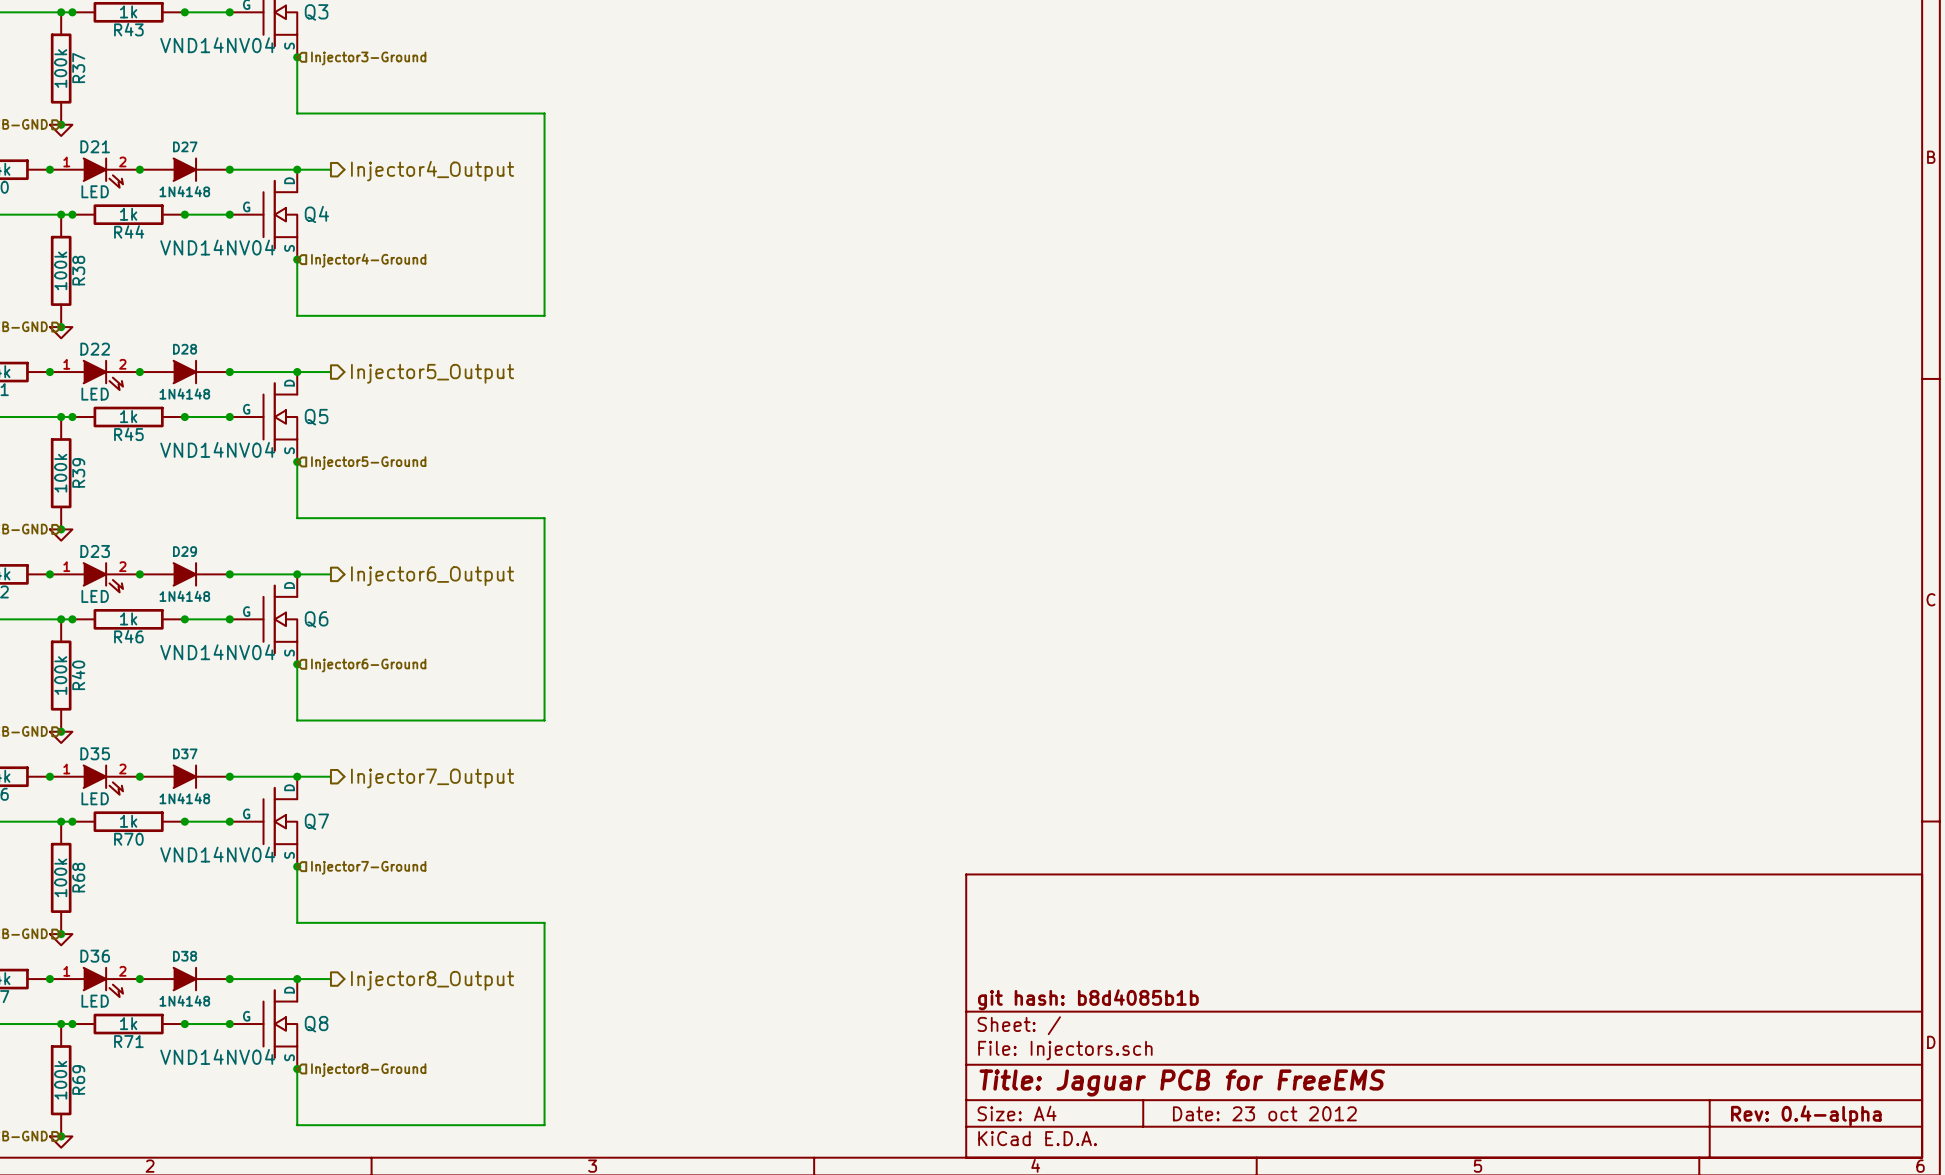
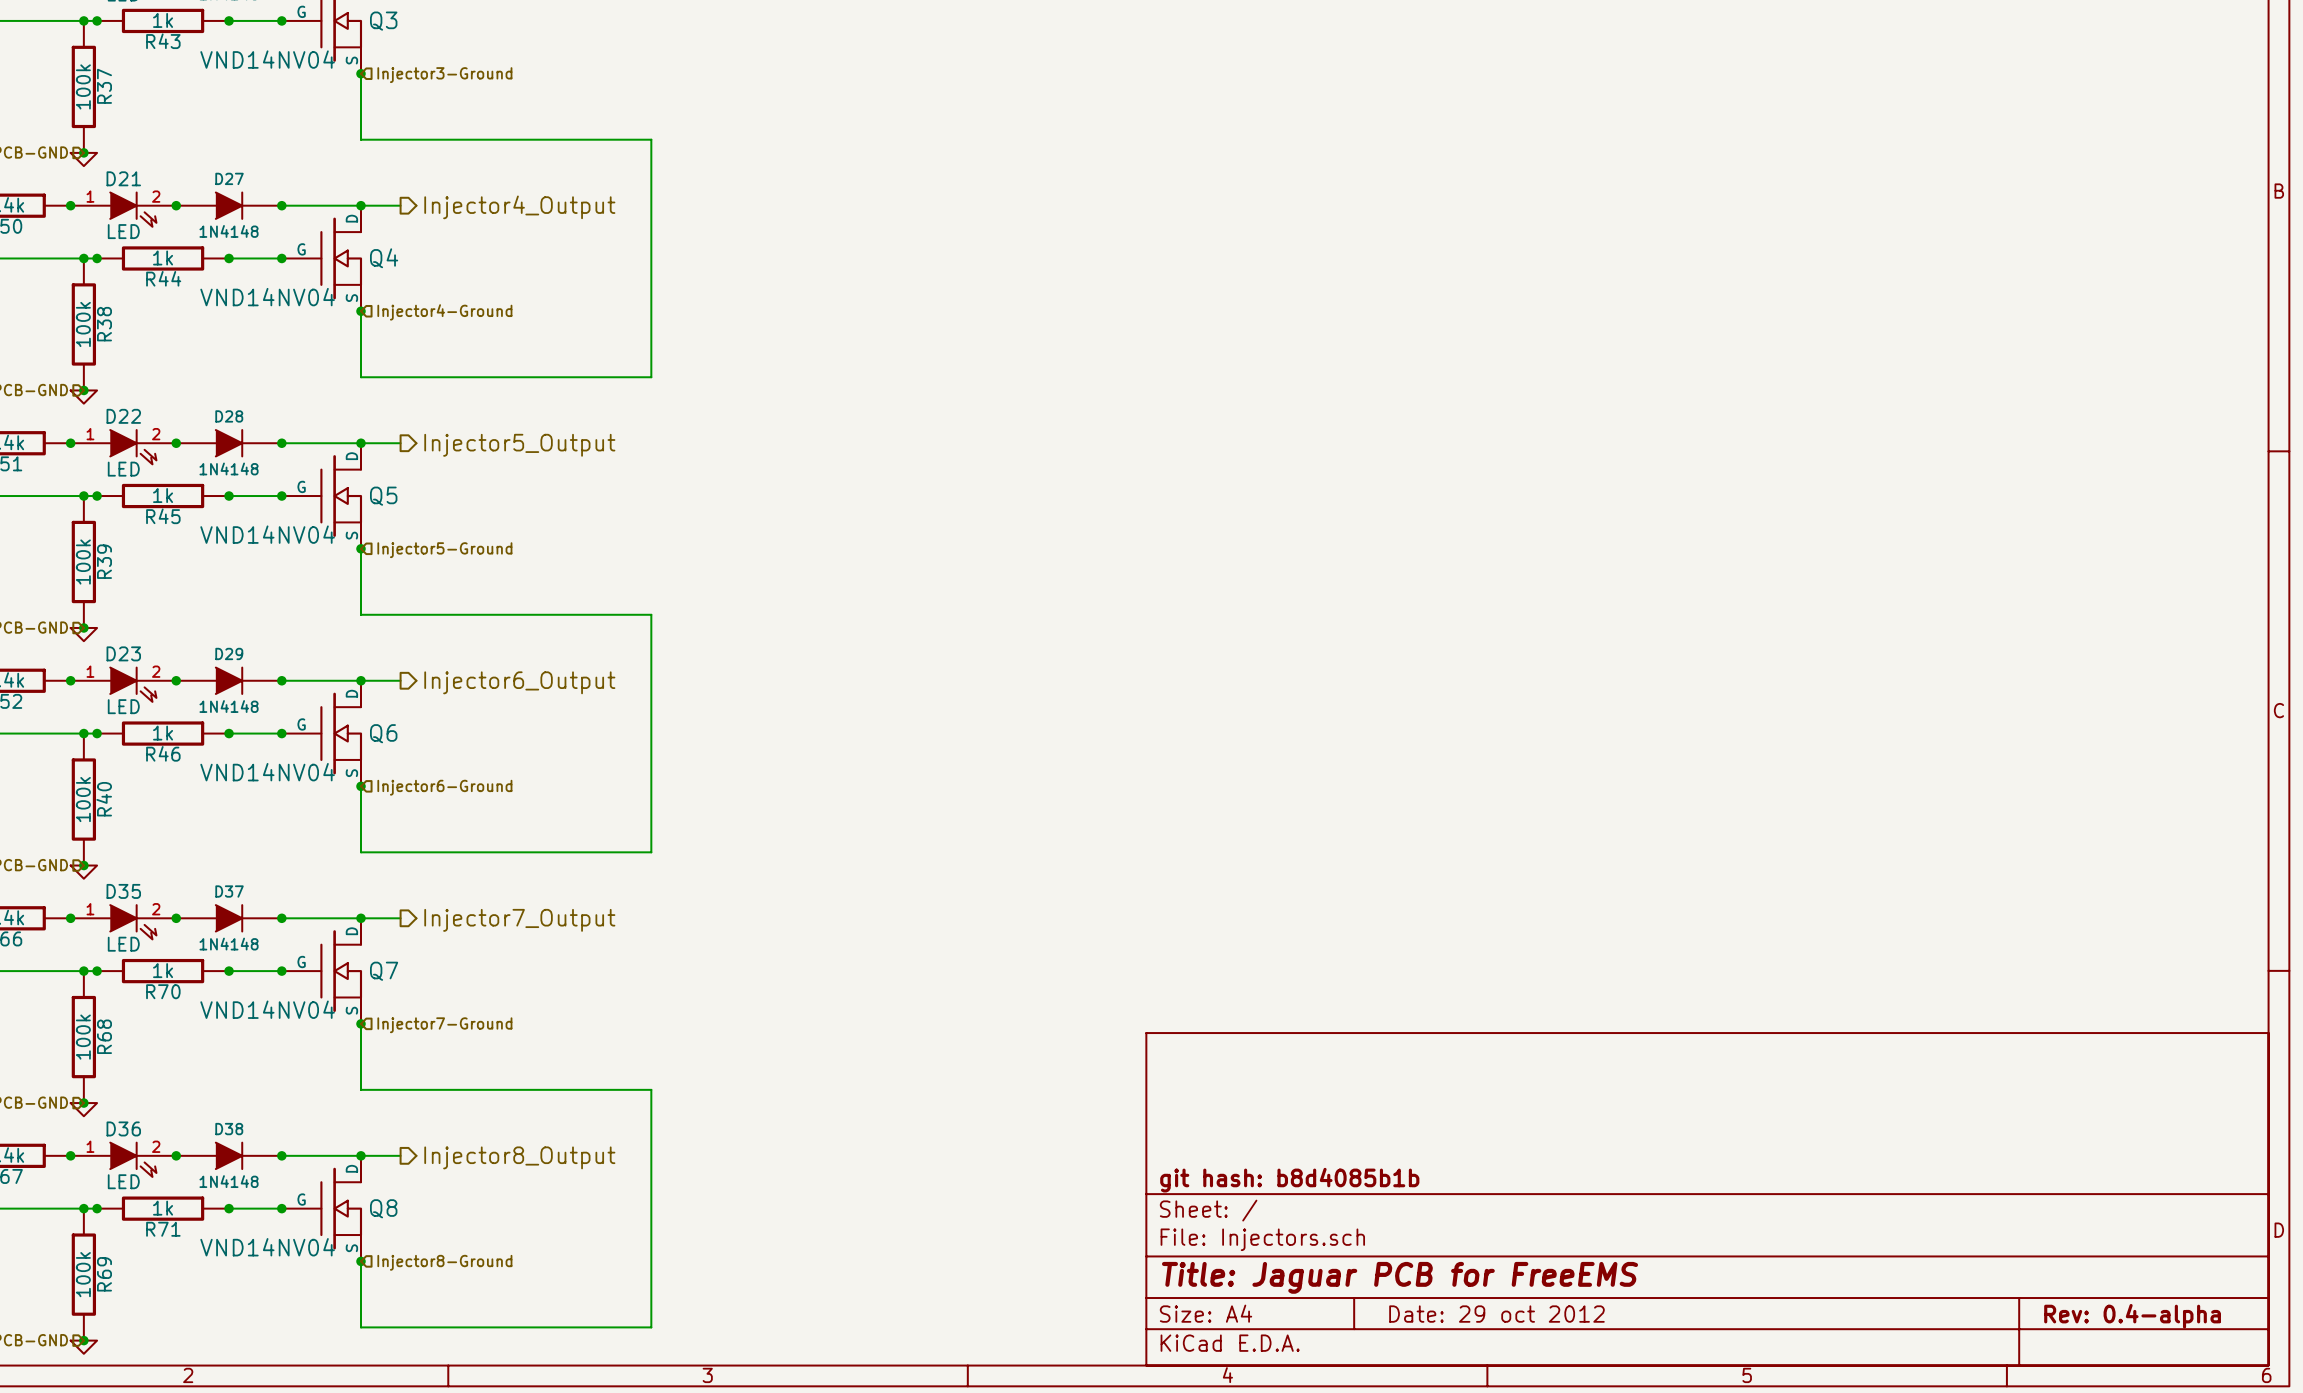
title block: Date: 23 oct 2012 (1264, 1113) -> Date: 29 oct 2012 (1496, 1314)

